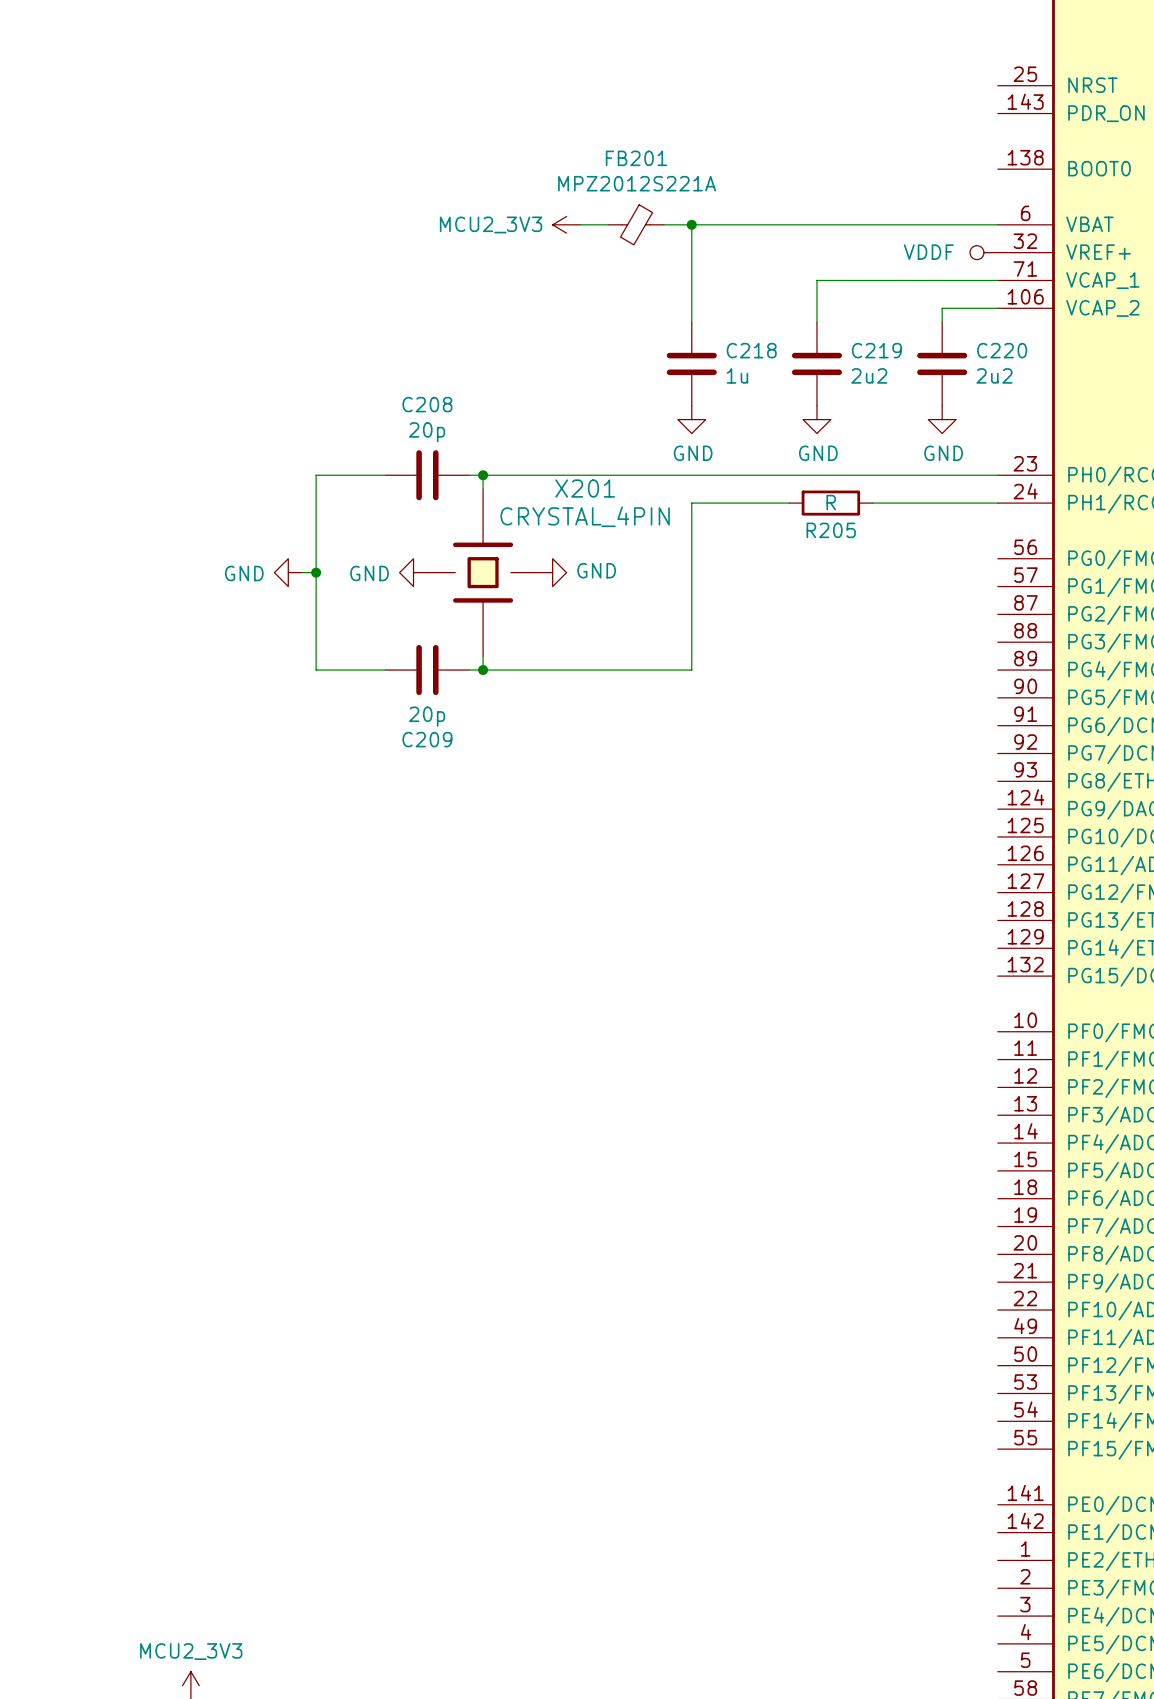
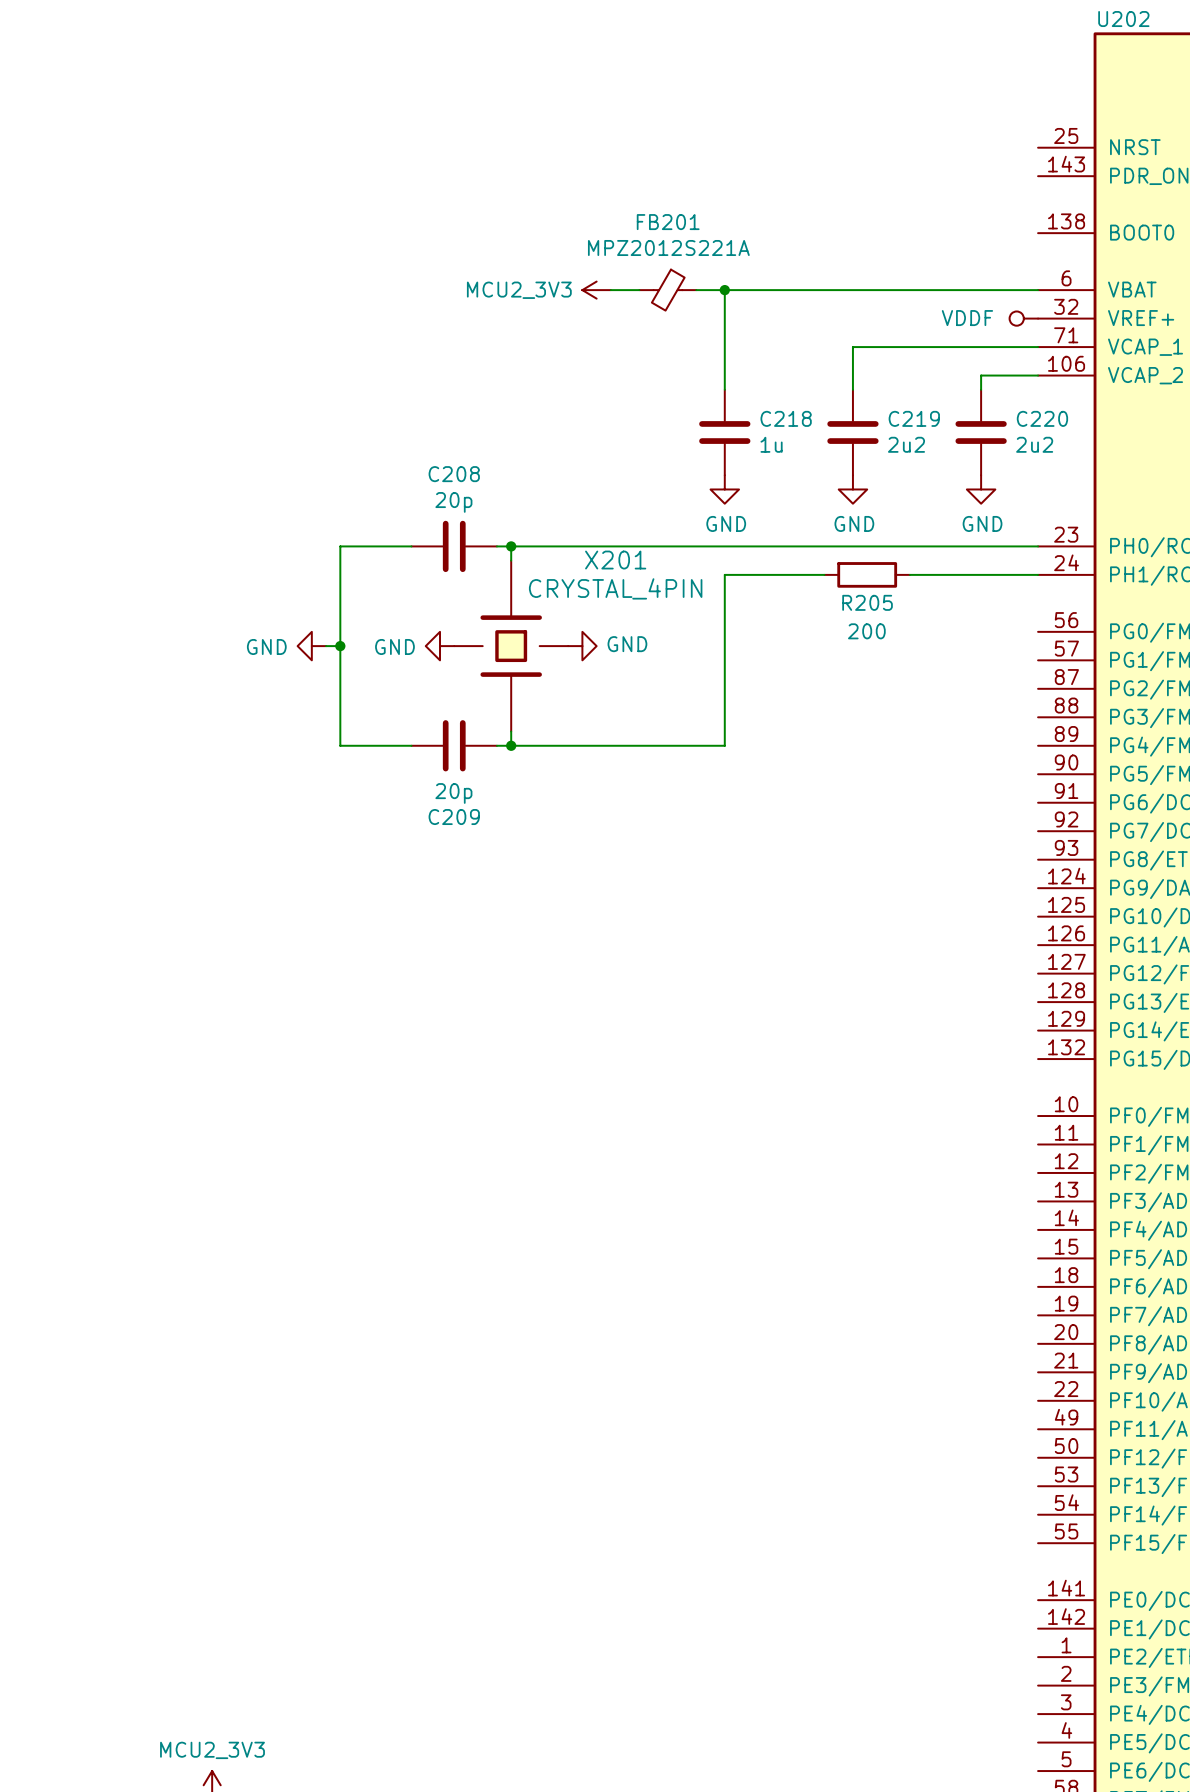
R205 value: R (831, 502) -> 200 (866, 631)

